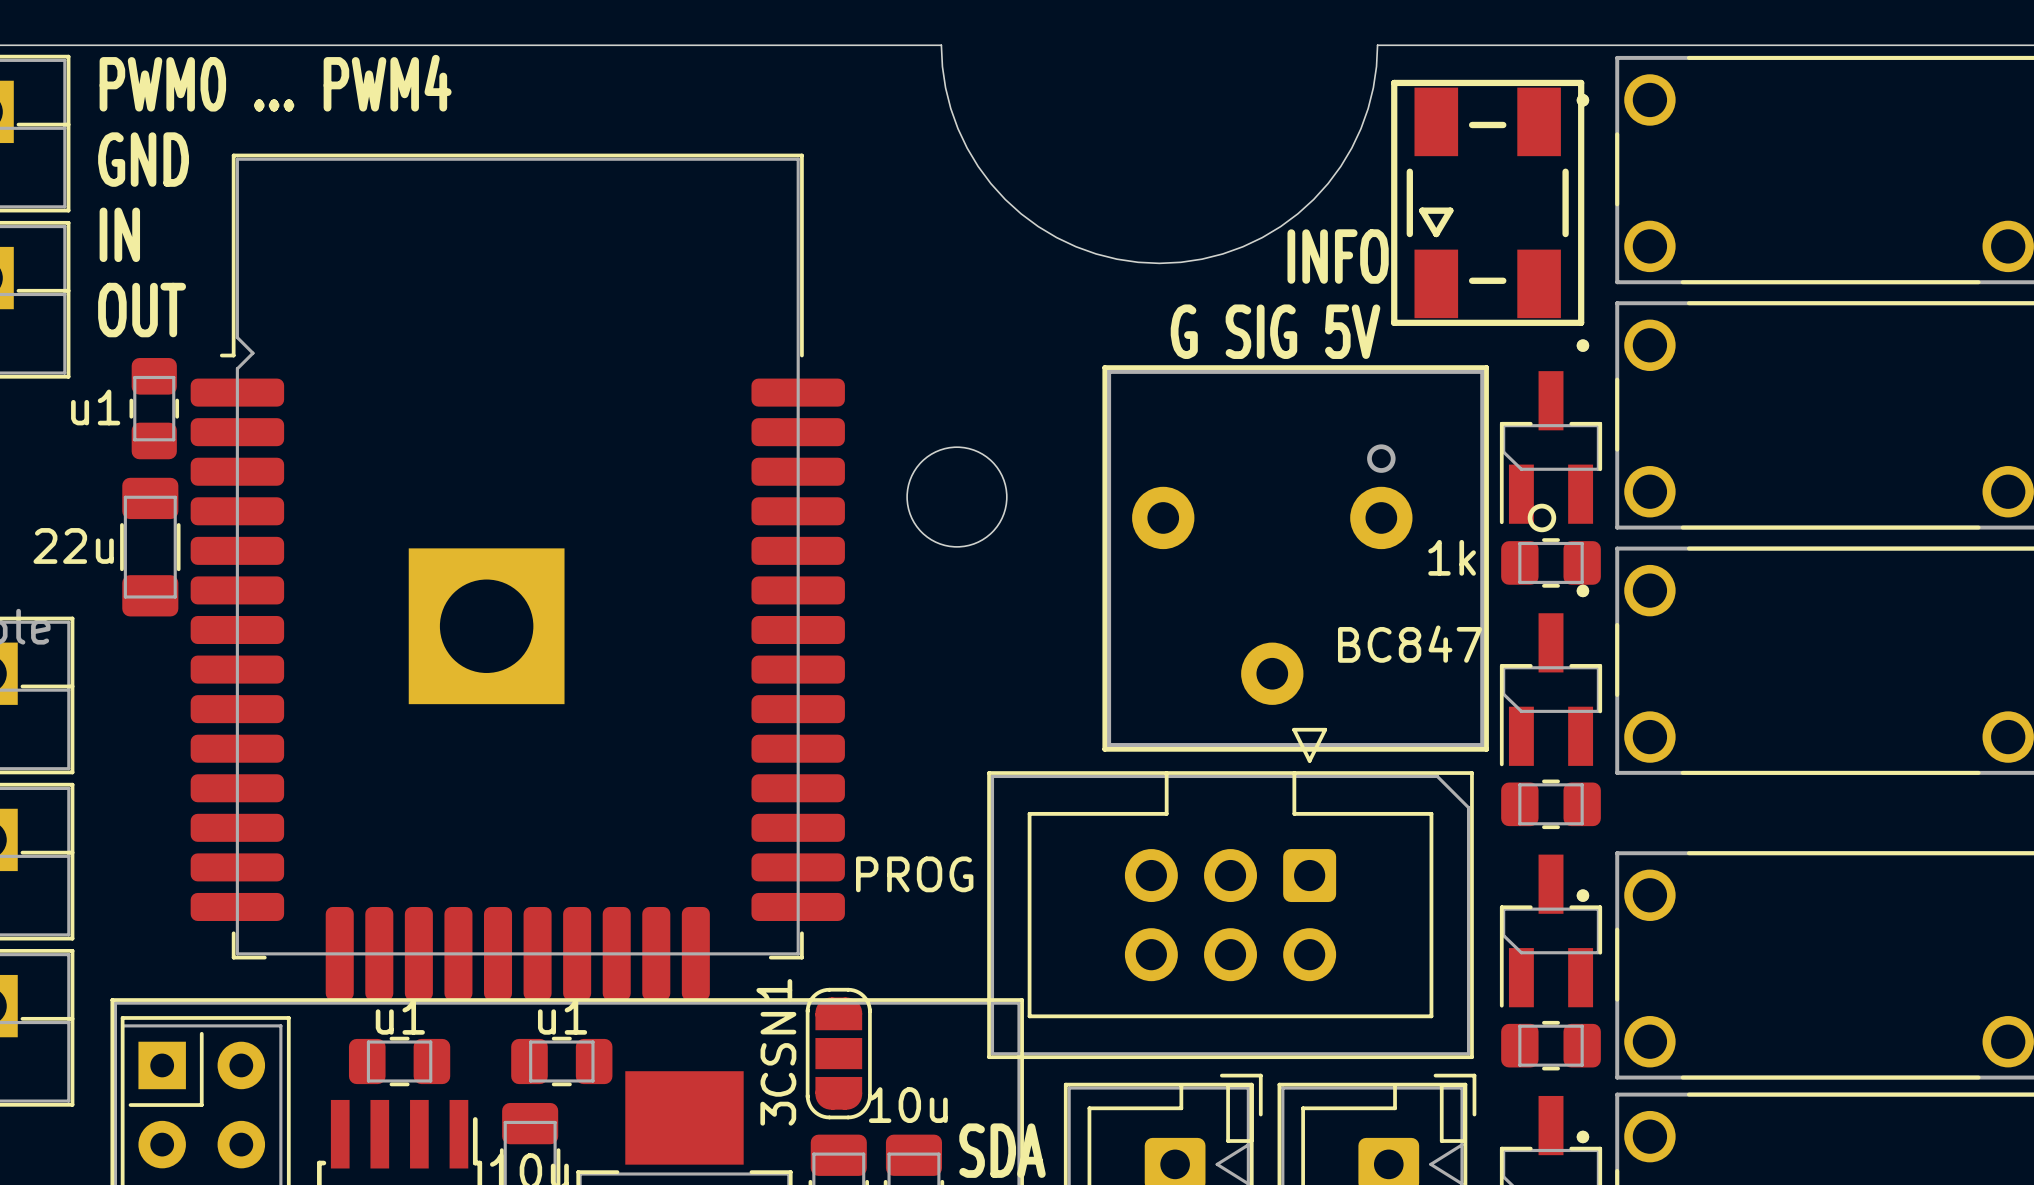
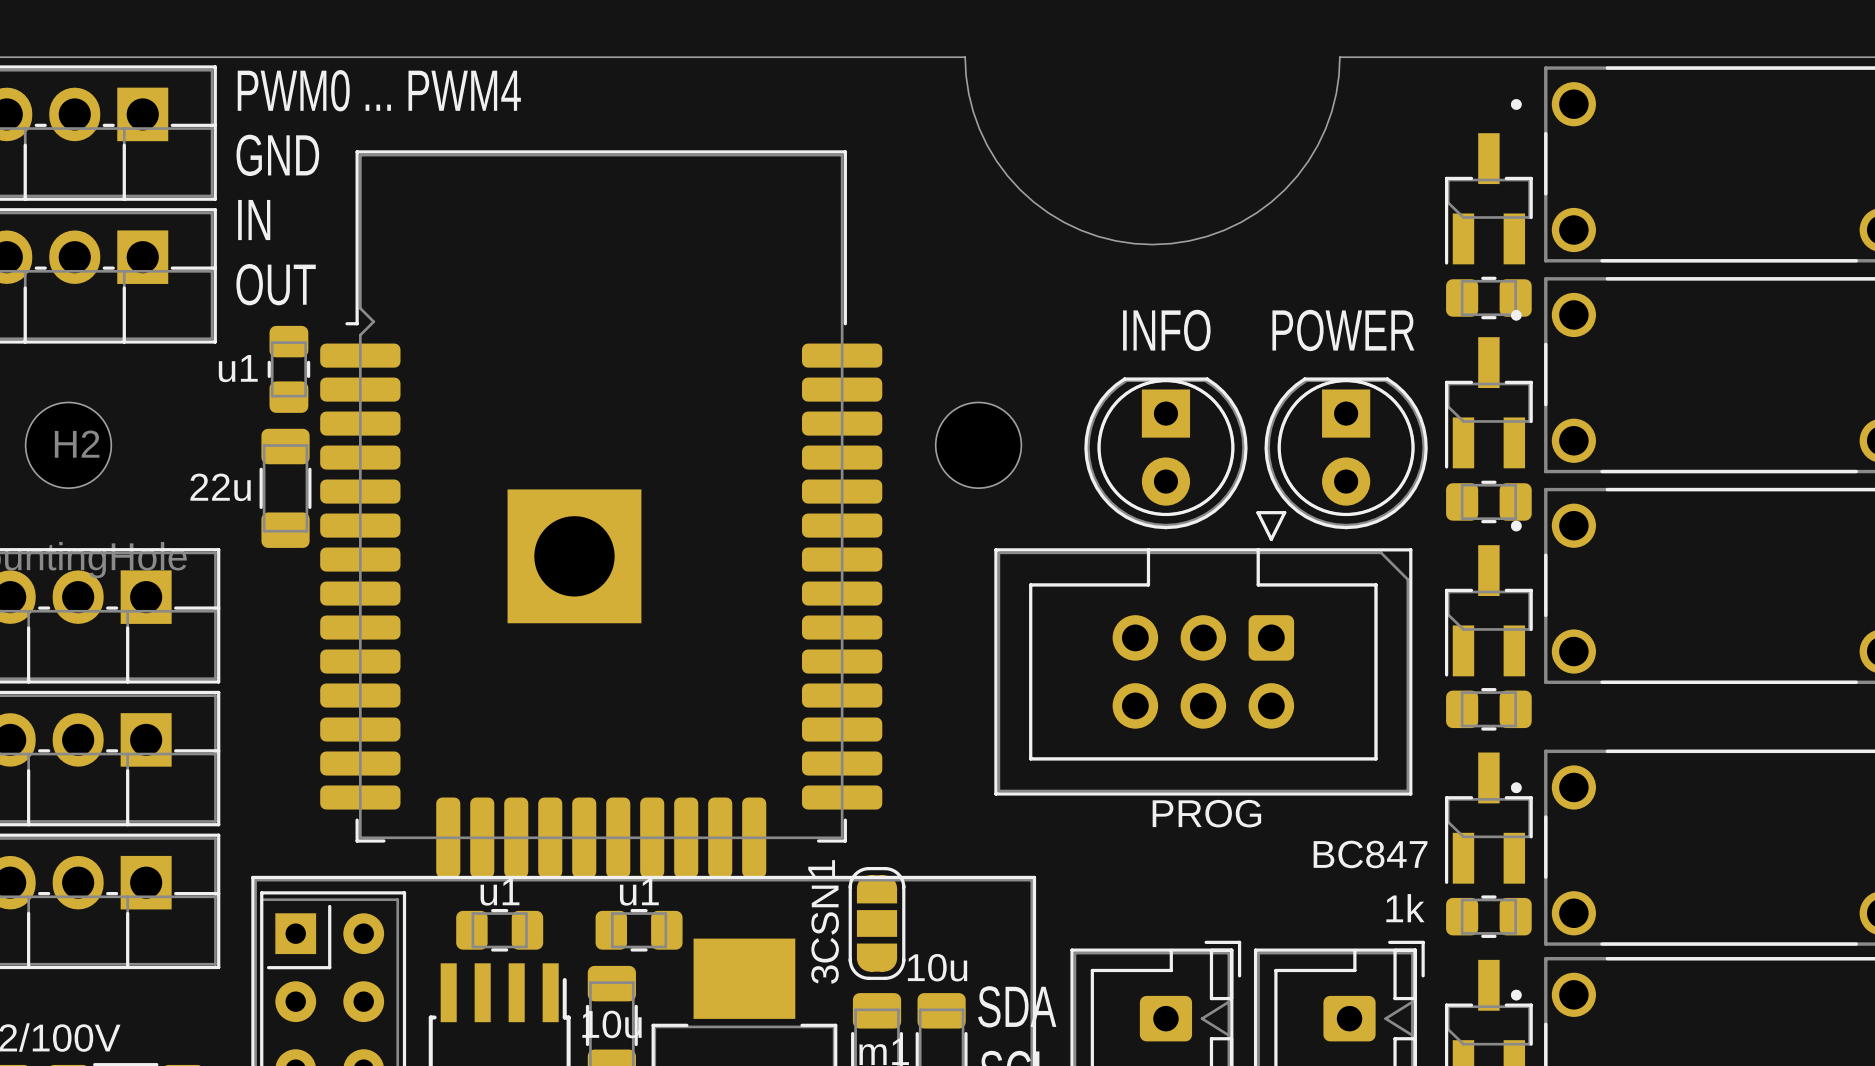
part: (1487, 202) -> none
part: none -> (1488, 198)
text position: INFO (1338, 256) -> INFO (1166, 330)
part: none -> (1488, 297)
text: G SIG 5V (1275, 331) -> none
text: none -> POWER (1343, 330)
part: none -> (1165, 453)
part: none -> (1346, 453)
part value position: 1k (1452, 557) -> 1k (1405, 908)
part: (1329, 558) -> none
part value position: BC847 (1410, 644) -> BC847 (1370, 854)
part value position: PROG (914, 874) -> PROG (1206, 813)
part position: (1230, 893) -> (1203, 653)

